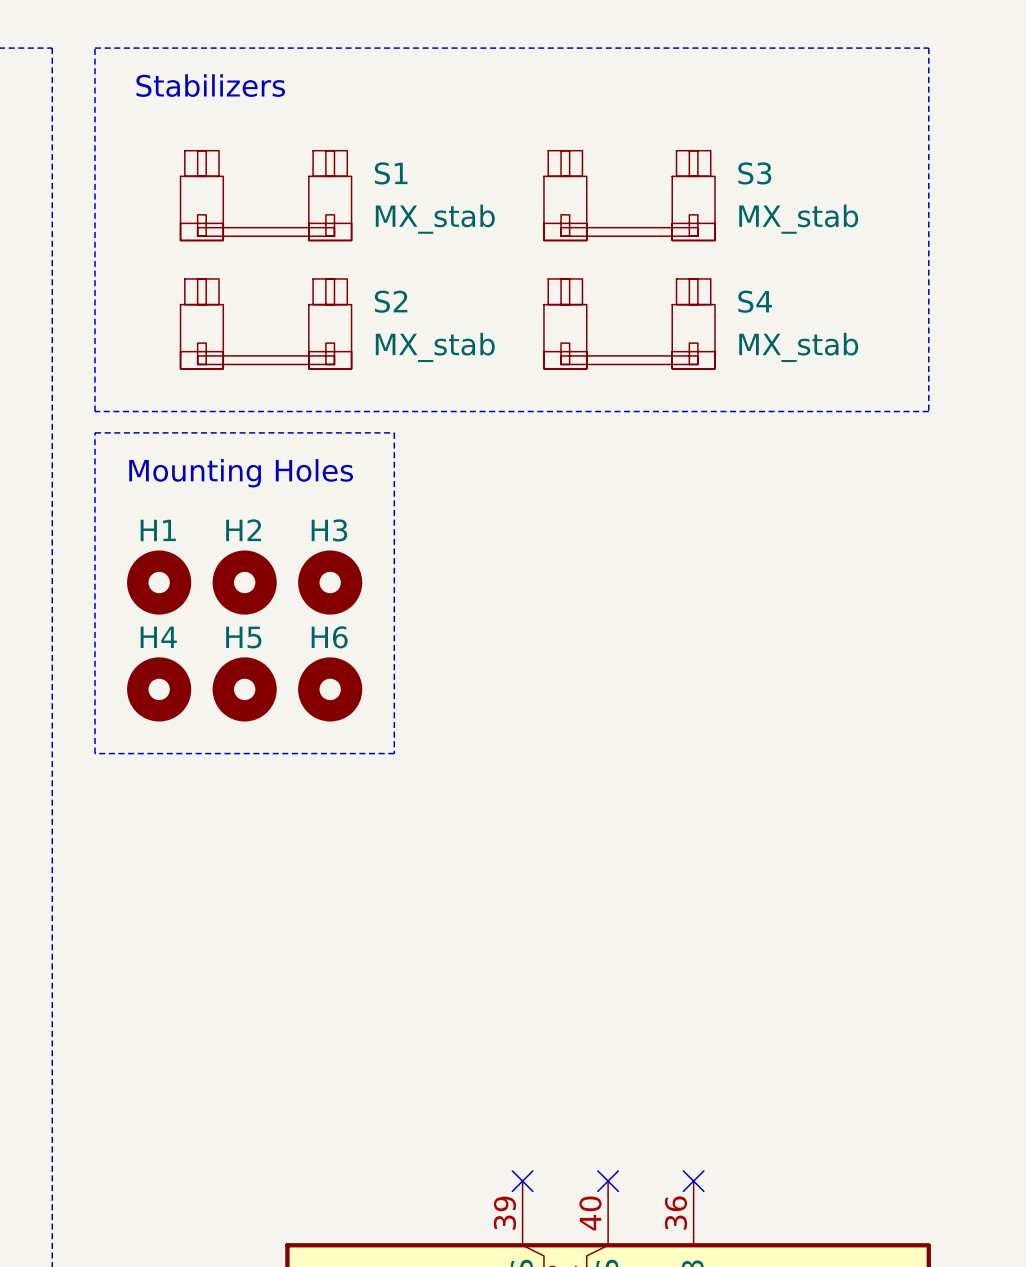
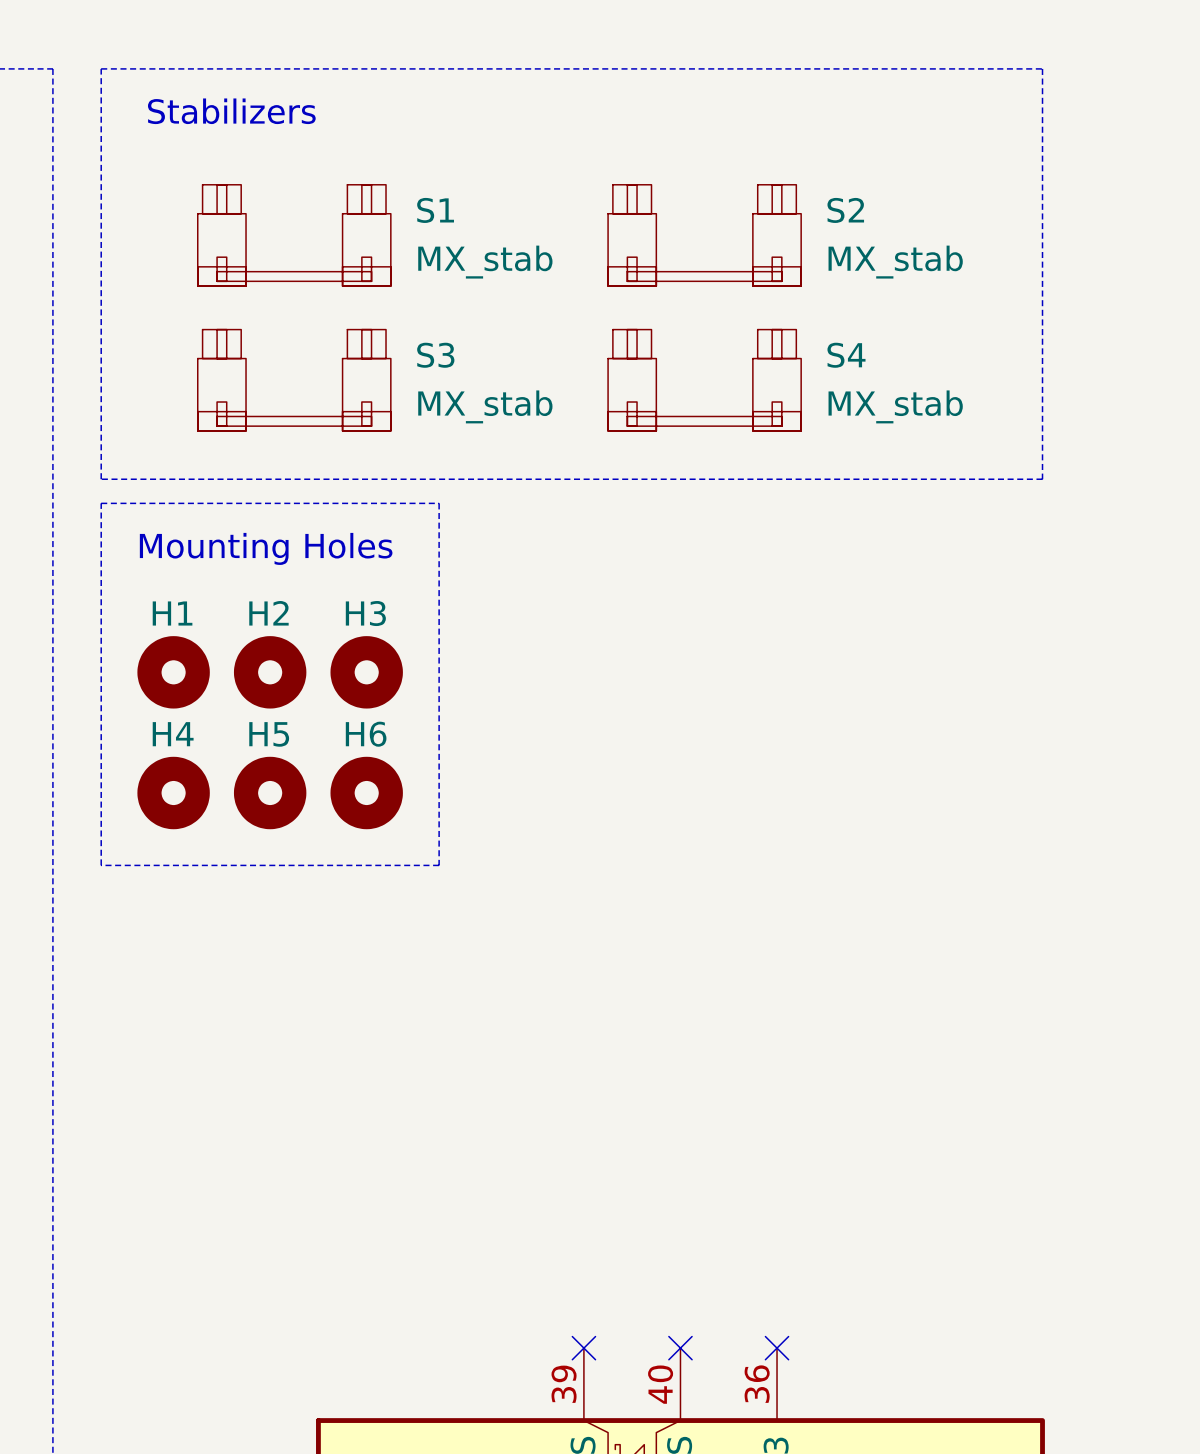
S3 name: S3 (754, 173) -> S2 (845, 210)
S2 name: S2 (391, 301) -> S3 (435, 355)

